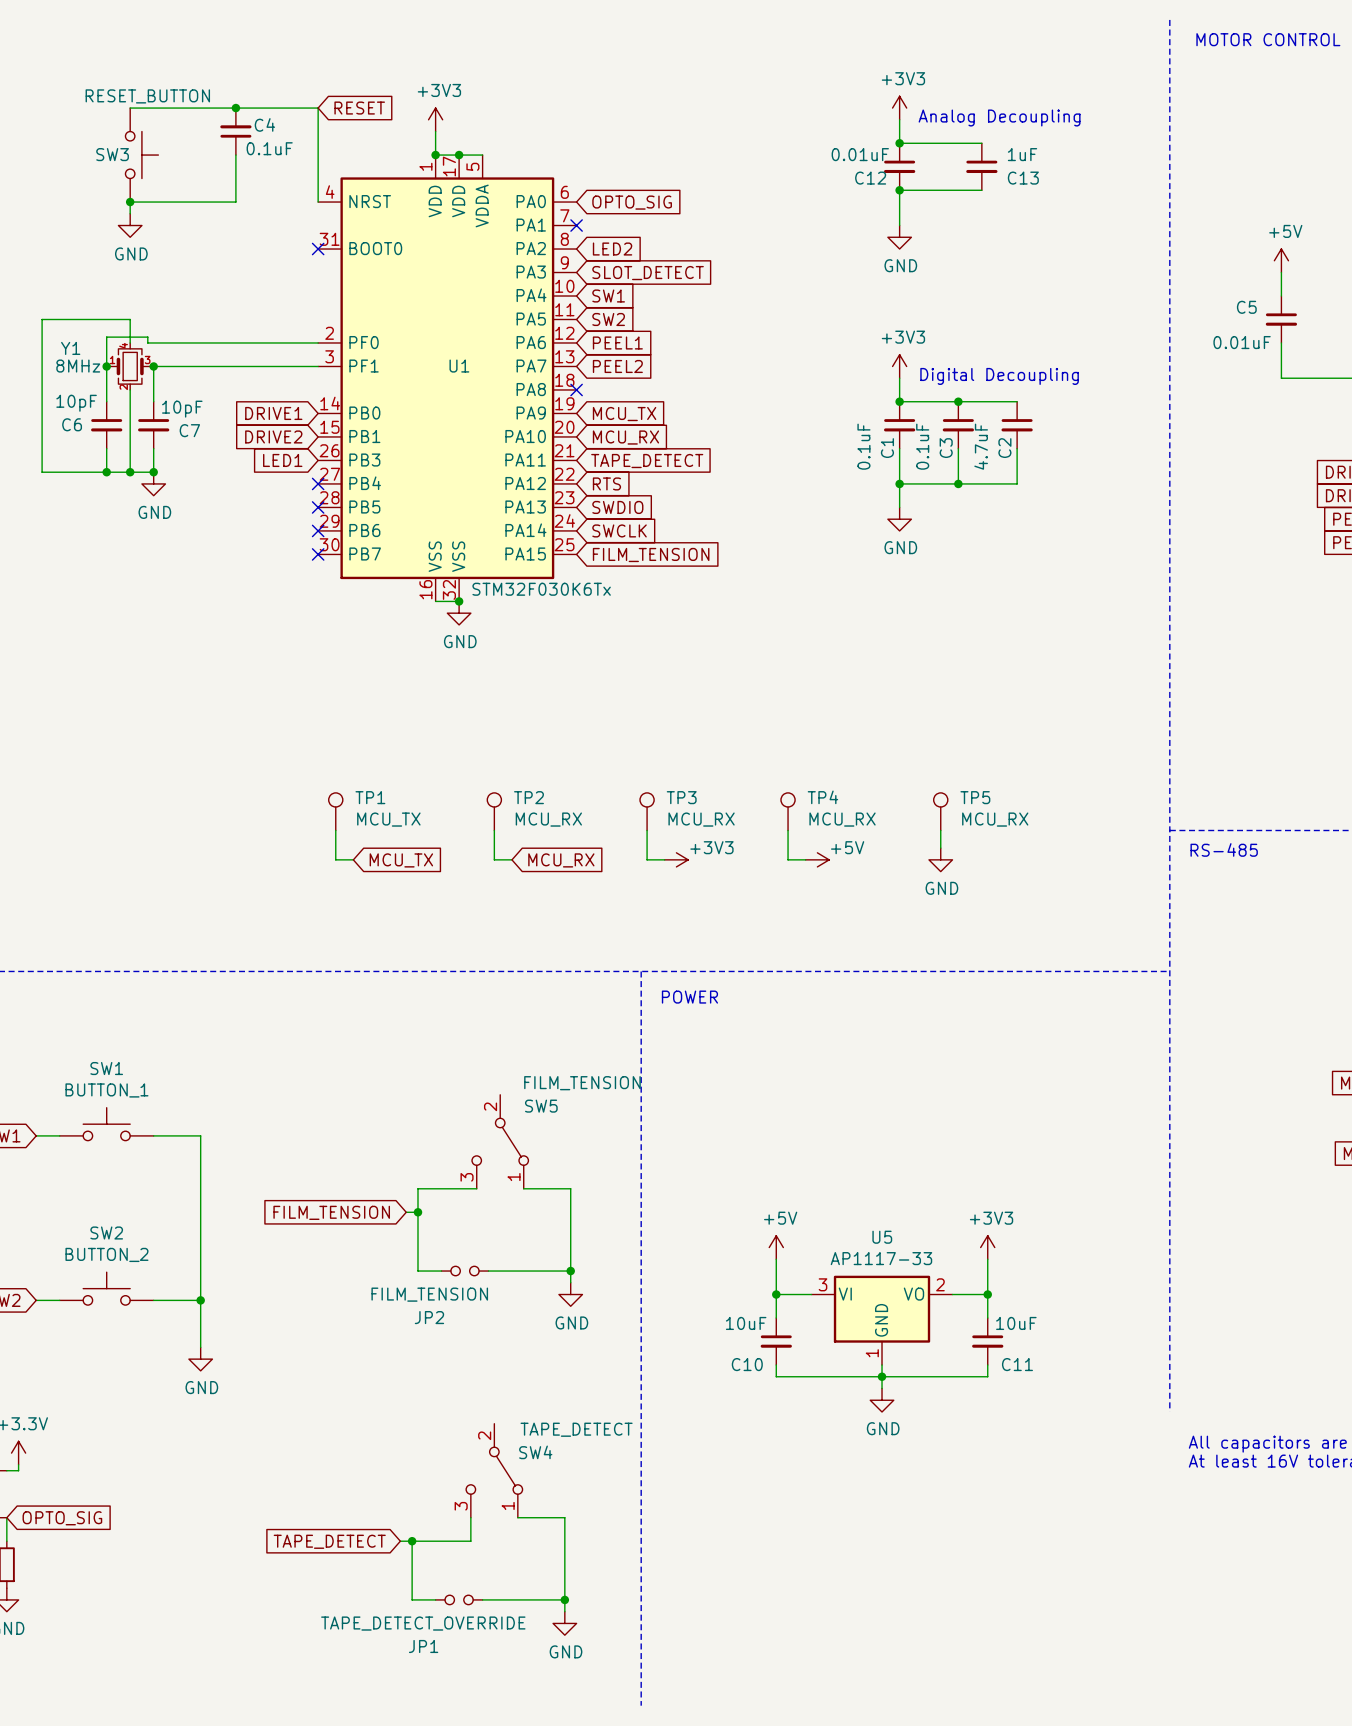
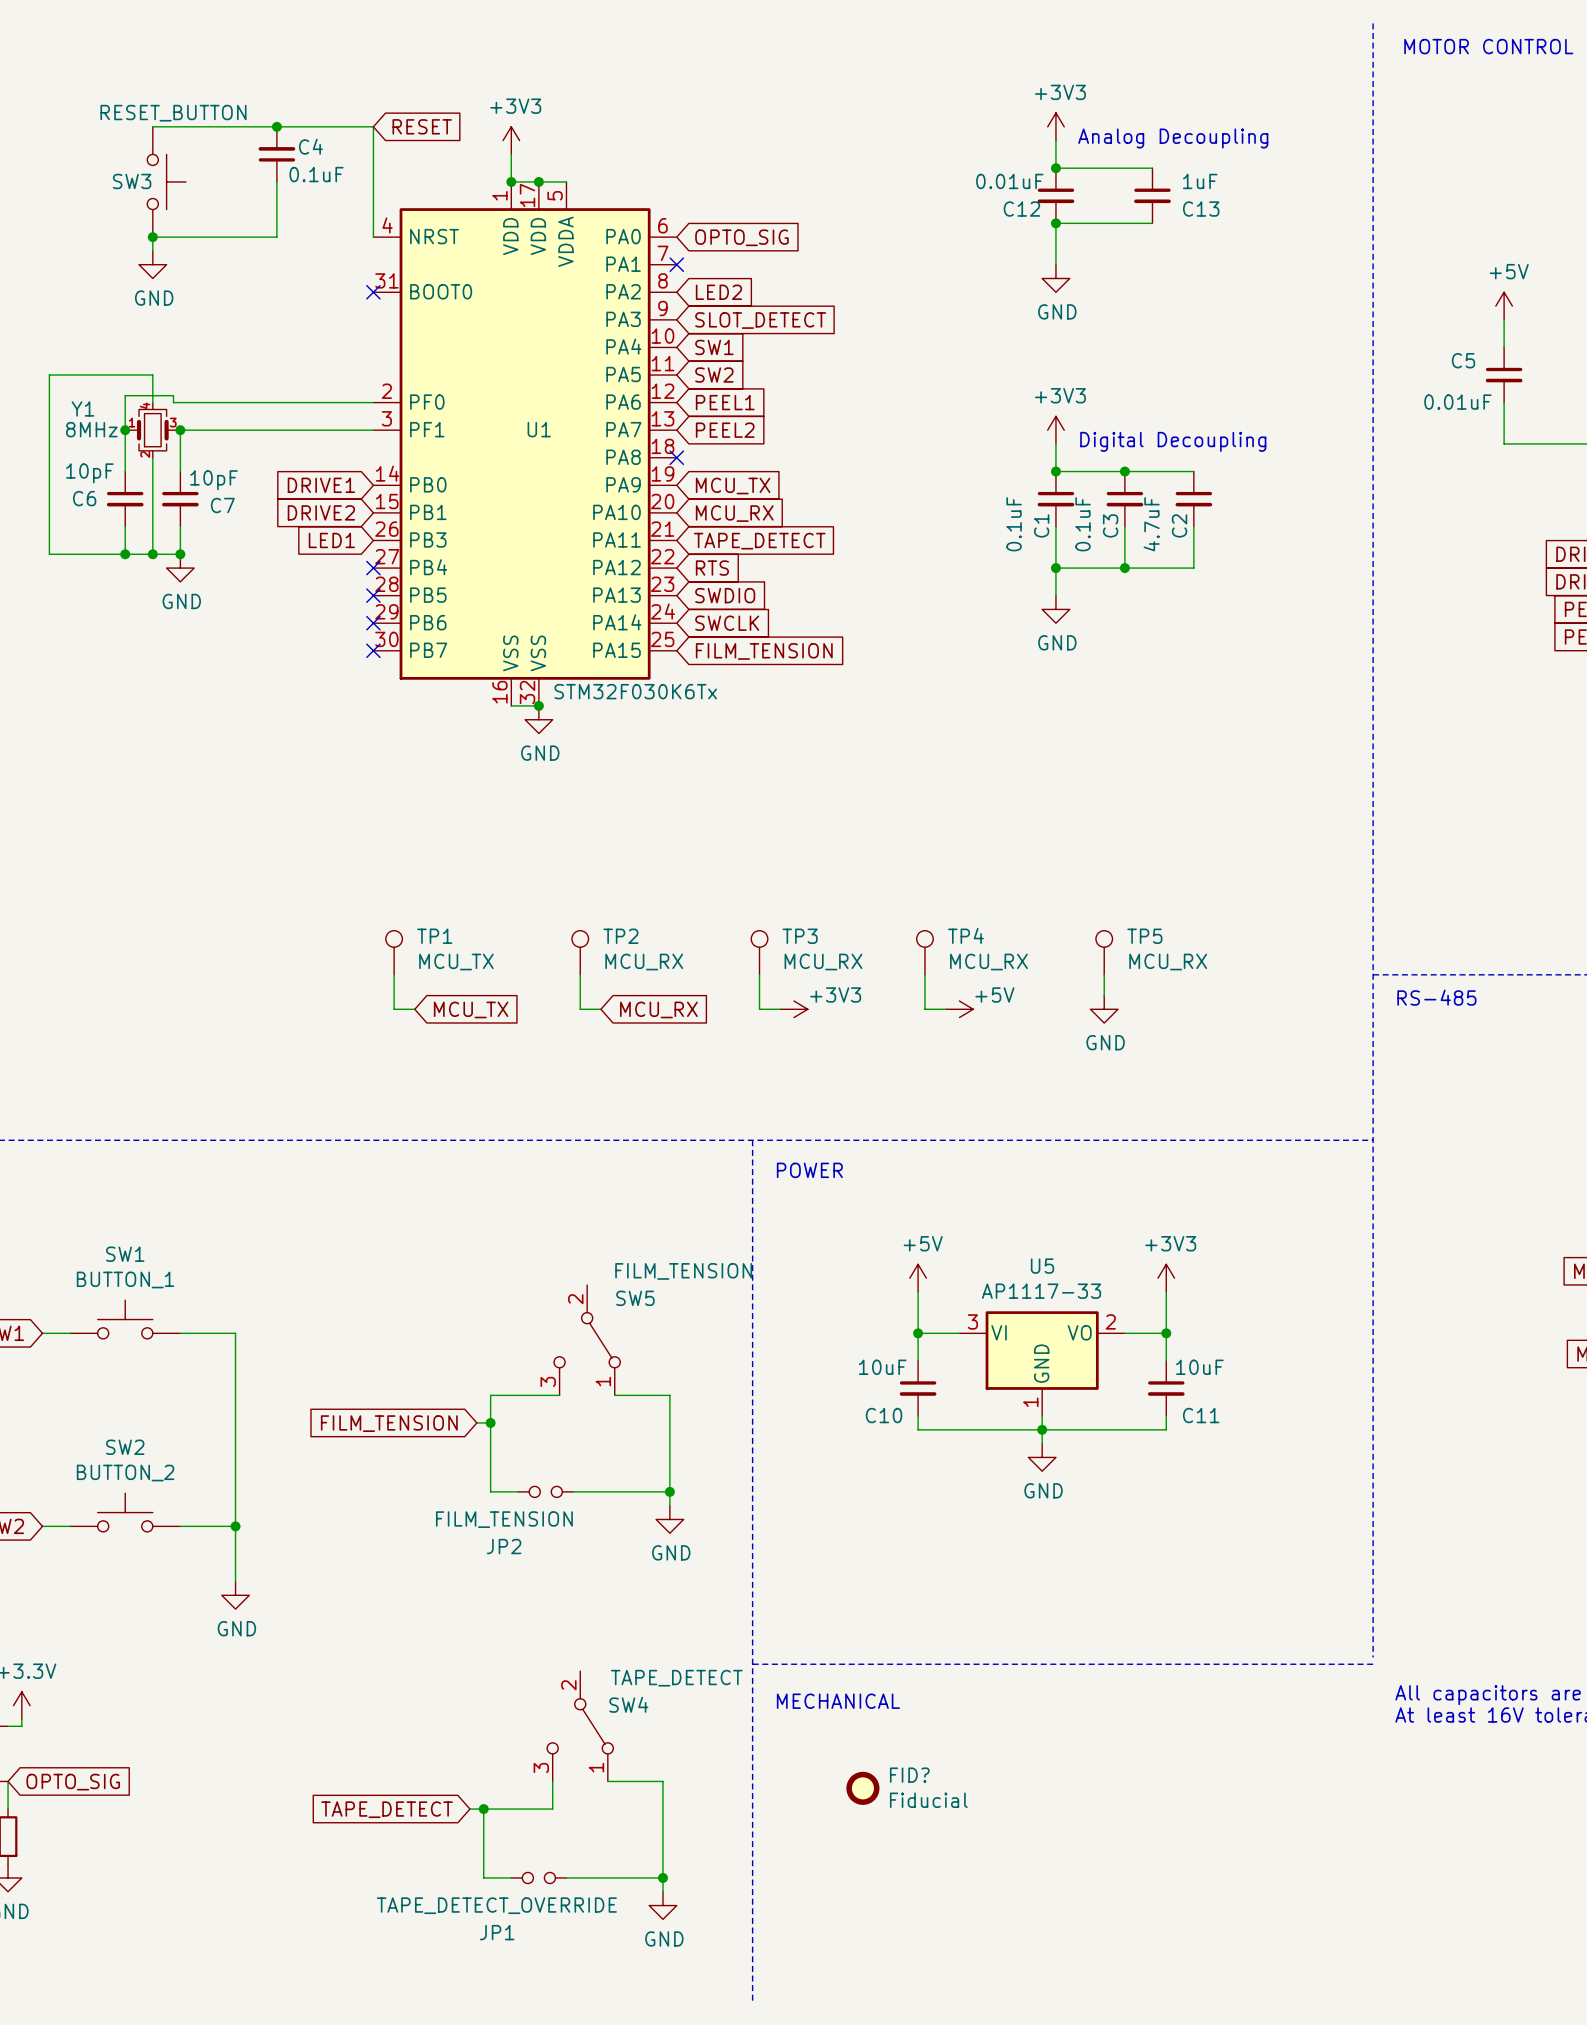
junction: none -> (918, 1333)
junction: none -> (1166, 1333)
junction: none -> (1042, 1429)
power symbol position: +5V (776, 1247) -> +5V (918, 1278)
power symbol position: +3V3 (987, 1247) -> +3V3 (1166, 1278)
wire: (776, 1259) (776, 1318) -> (918, 1291) (918, 1360)
wire: (987, 1259) (987, 1318) -> (1166, 1291) (1166, 1360)
wire: (776, 1294) (811, 1294) -> (918, 1333) (959, 1333)
junction: (776, 1294) -> none
wire: (952, 1294) (987, 1294) -> (1124, 1333) (1166, 1333)
junction: (987, 1294) -> none
U5 position: (882, 1320) -> (1042, 1363)
C10 position: (776, 1341) -> (918, 1388)
C11 position: (987, 1341) -> (1166, 1388)
wire: (776, 1365) (776, 1376) (987, 1376) (987, 1365) -> (918, 1416) (918, 1429) (1166, 1429) (1166, 1416)
wire: (882, 1365) (882, 1388) -> (1042, 1416) (1042, 1443)
junction: (882, 1376) -> none
power symbol position: GND (882, 1400) -> GND (1042, 1457)
line: none -> (752, 1664) (1373, 1664)
text: none -> MECHANICAL (838, 1701)
FID?: none -> Fiducial (862, 1788)

